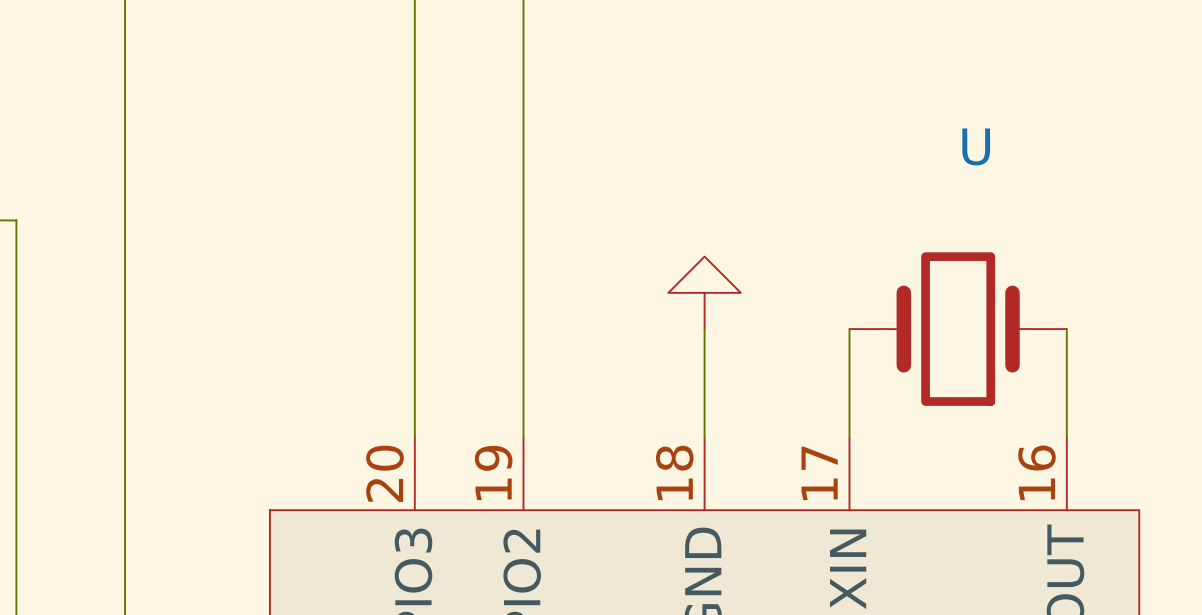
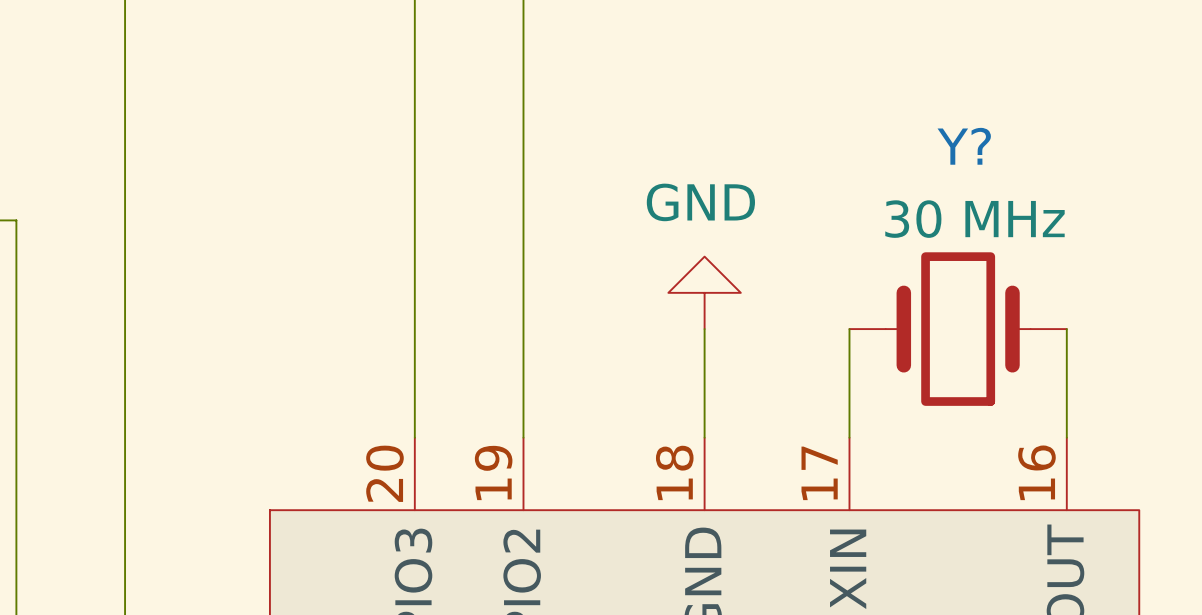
U name: U (976, 146) -> Y? (964, 146)
power symbol text: none -> GND (700, 202)
U value: none -> 30 MHz (974, 219)

